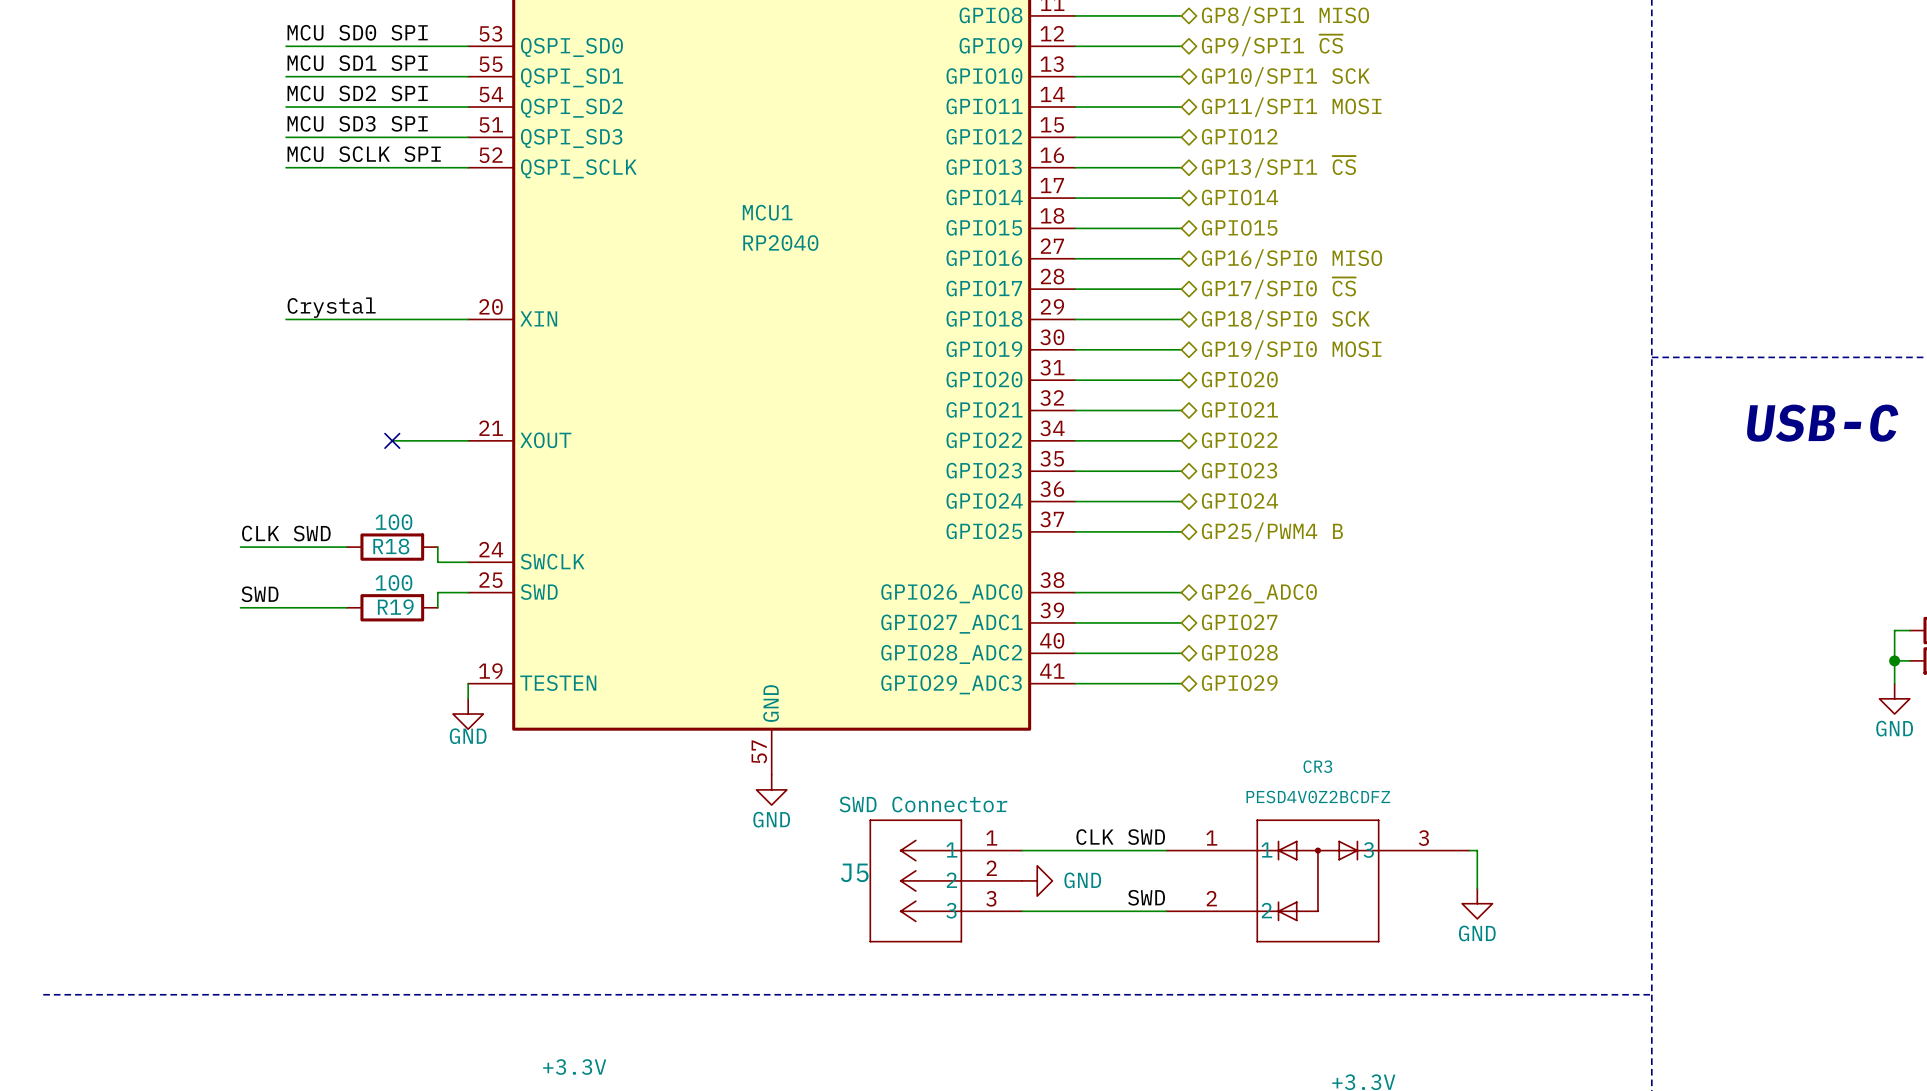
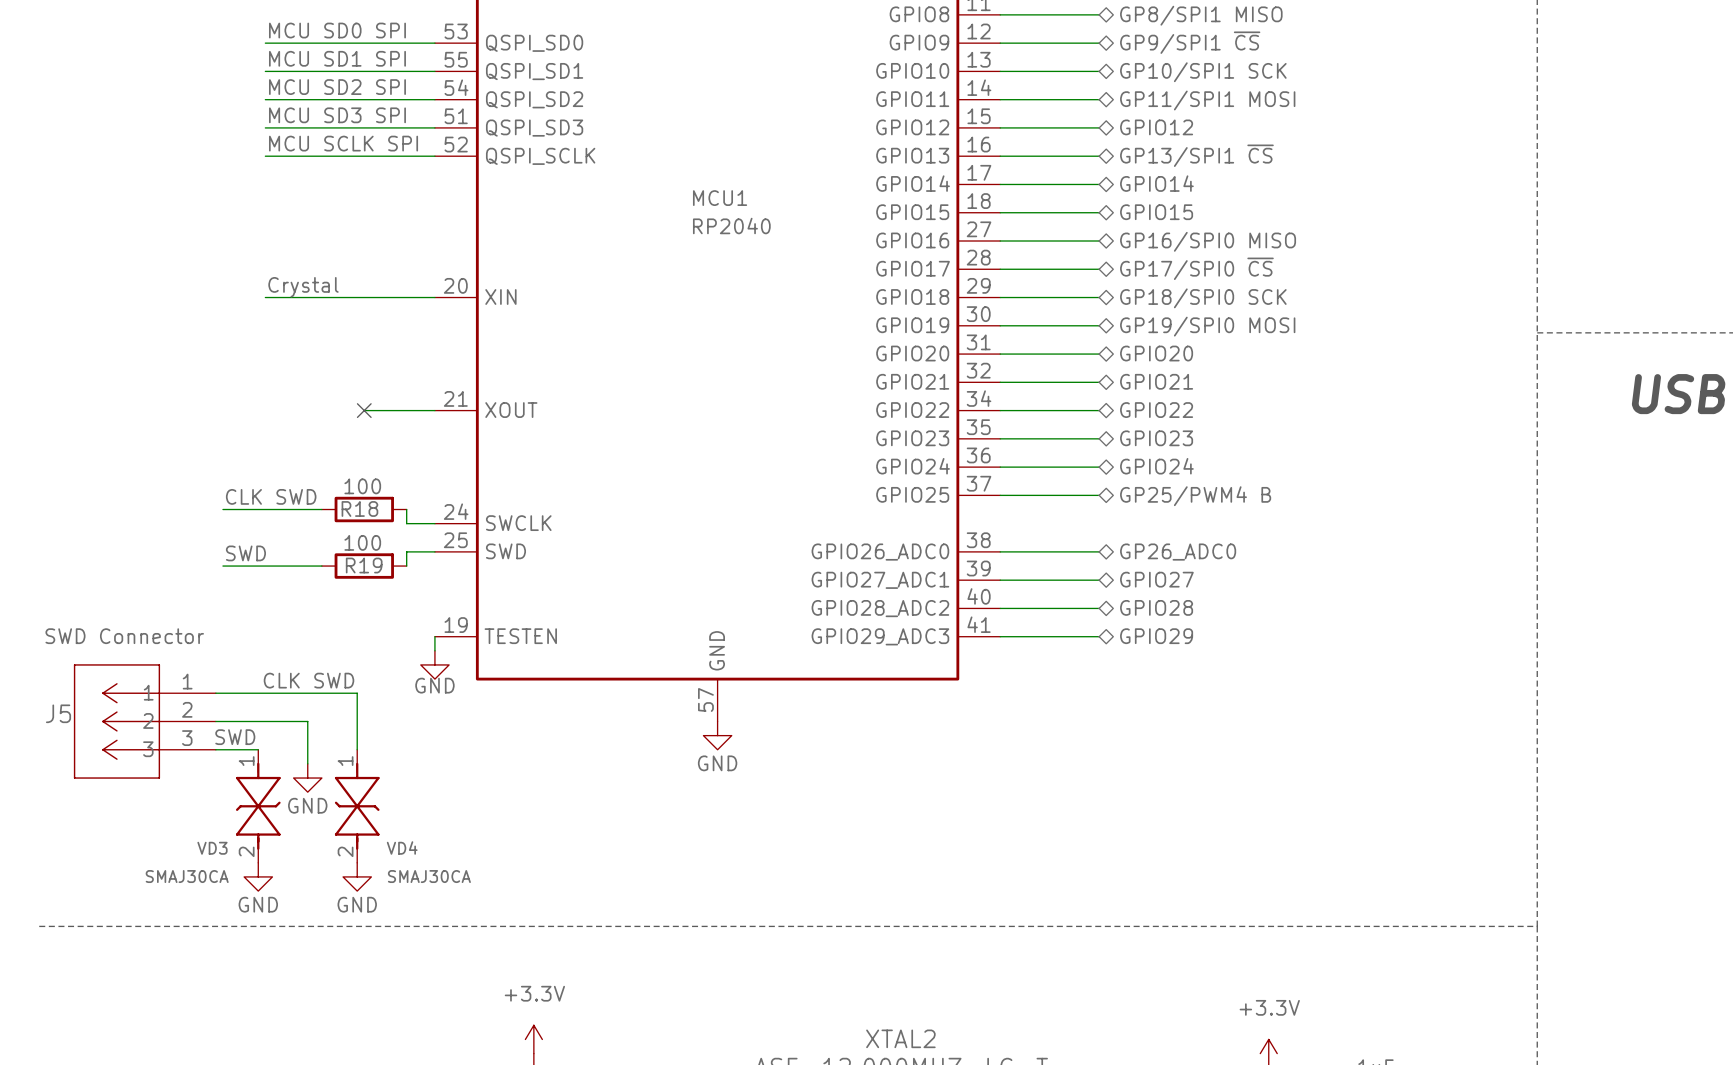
label: none -> CLK SWD (308, 680)
wire: none -> (215, 693) (357, 693) (357, 749)
wire: none -> (215, 721) (307, 721) (307, 763)
label: none -> SWD (235, 737)
J5 text position: SWD Connector (923, 804) -> SWD Connector (124, 636)
wire: none -> (215, 749) (258, 749)
power symbol: none -> GND (307, 778)
label: CLK SWD (1120, 837) -> none
wire: (1022, 850) (1166, 850) -> none
wire: (1469, 850) (1477, 850) (1477, 888) -> none
VD3: none -> SMAJ30CA (258, 806)
VD4: none -> SMAJ30CA (357, 806)
J5 position: (945, 880) -> (144, 721)
power symbol: GND (1037, 880) -> none
CR3: PESD4V0Z2BCDFZ (1317, 880) -> none
label: SWD (1146, 897) -> none
power symbol: GND (1477, 903) -> none
wire: (1022, 911) (1166, 911) -> none
power symbol: none -> GND (258, 876)
power symbol: none -> GND (357, 876)

